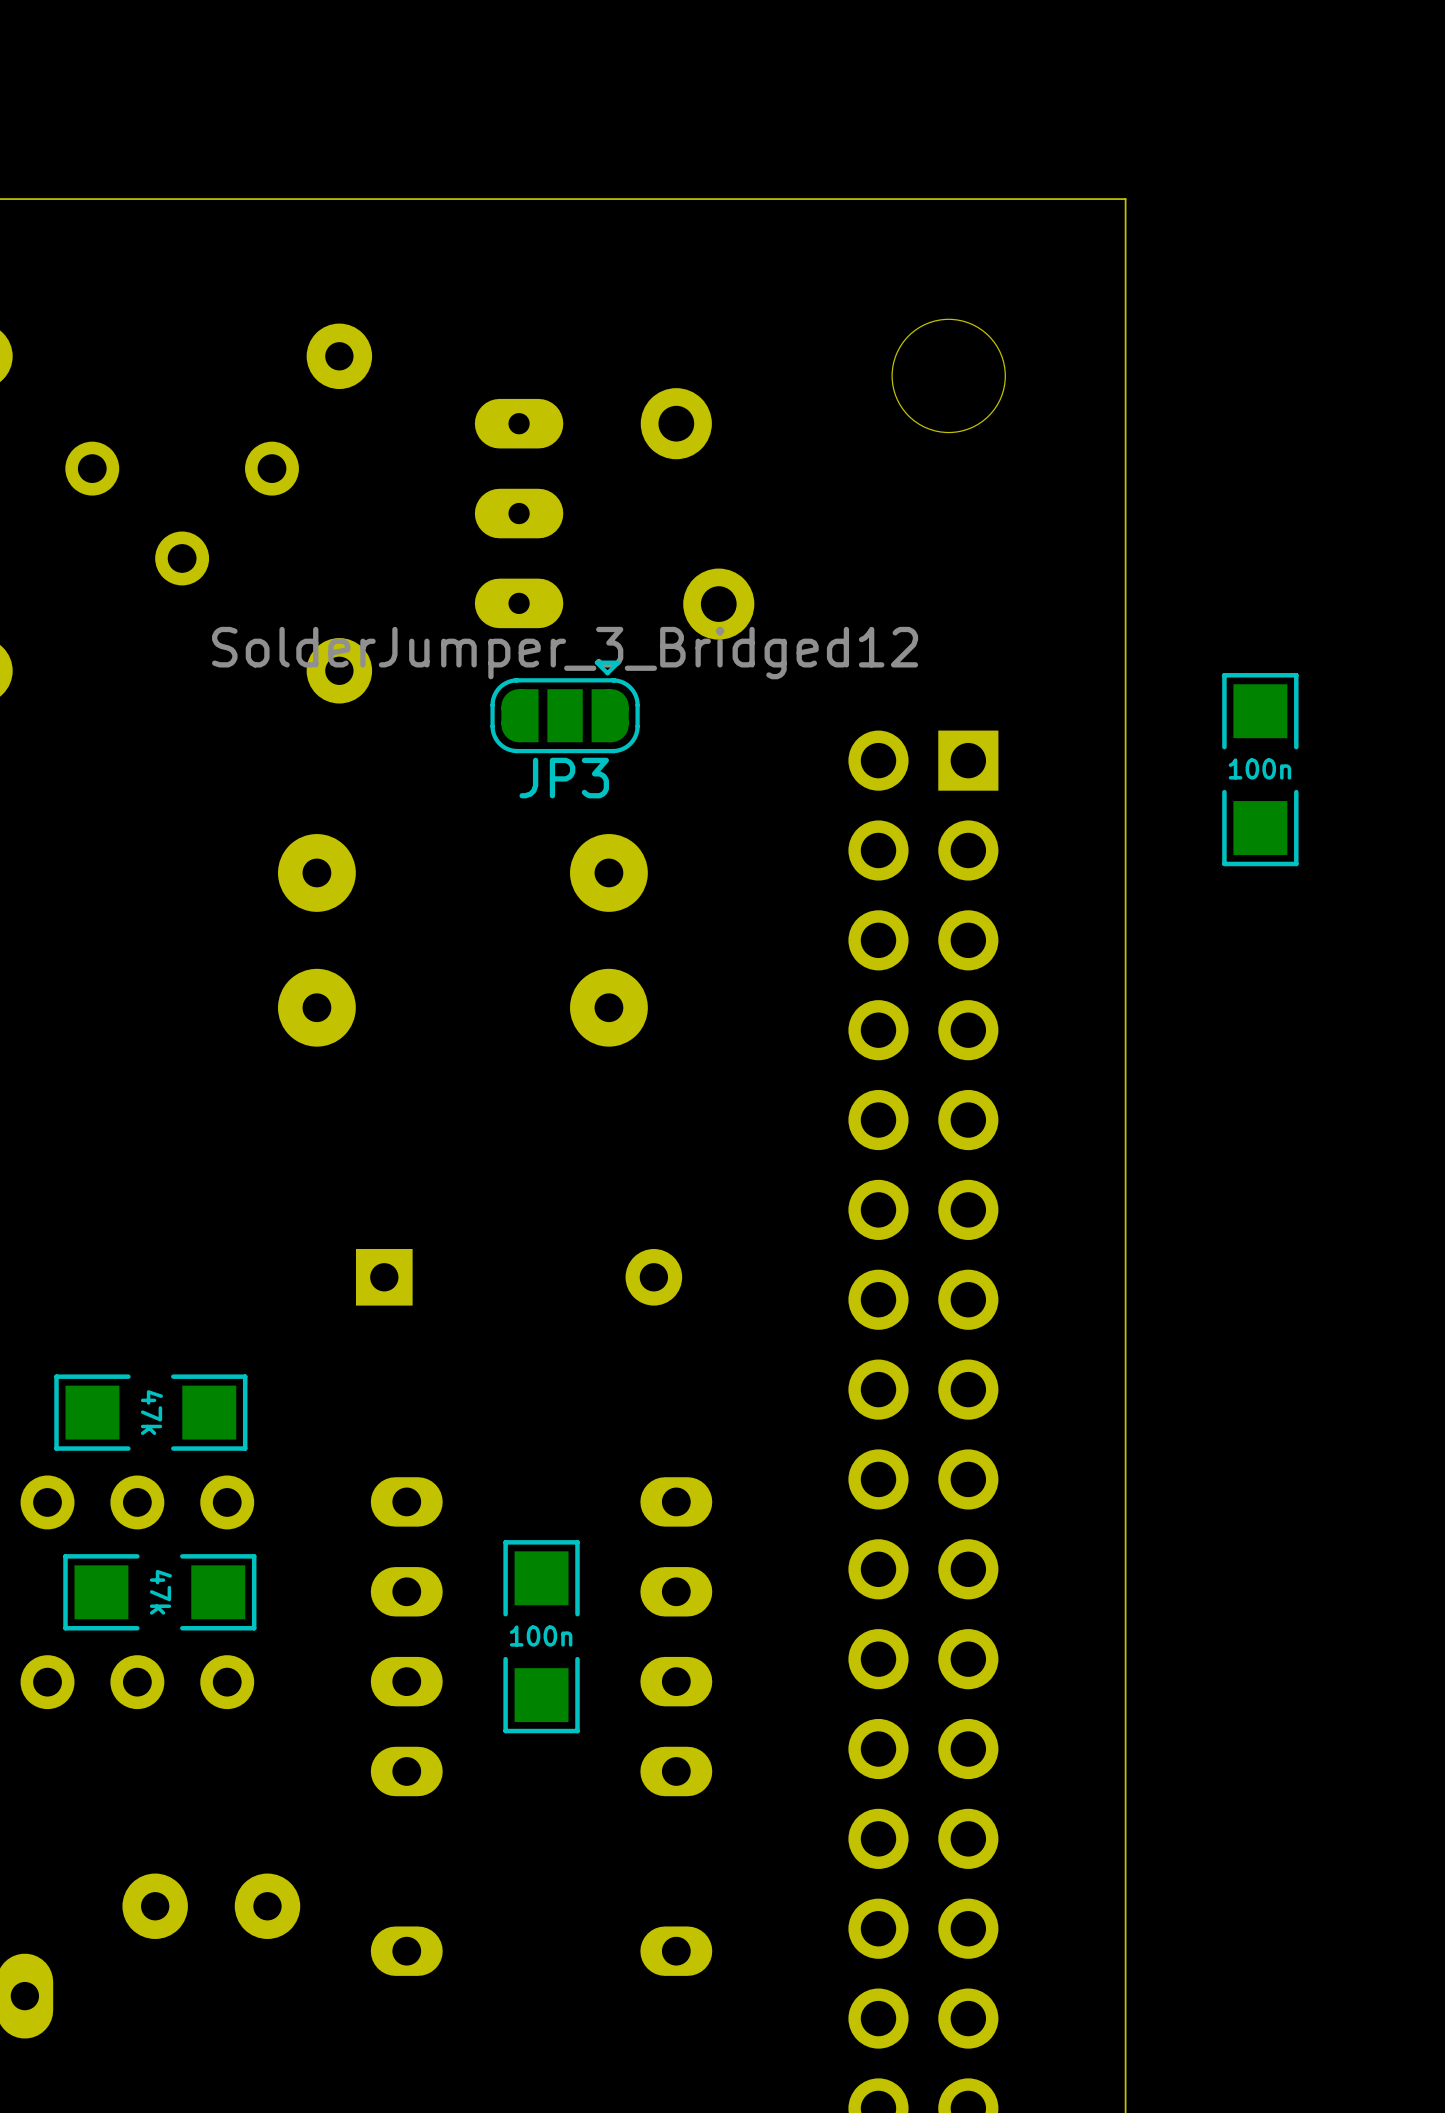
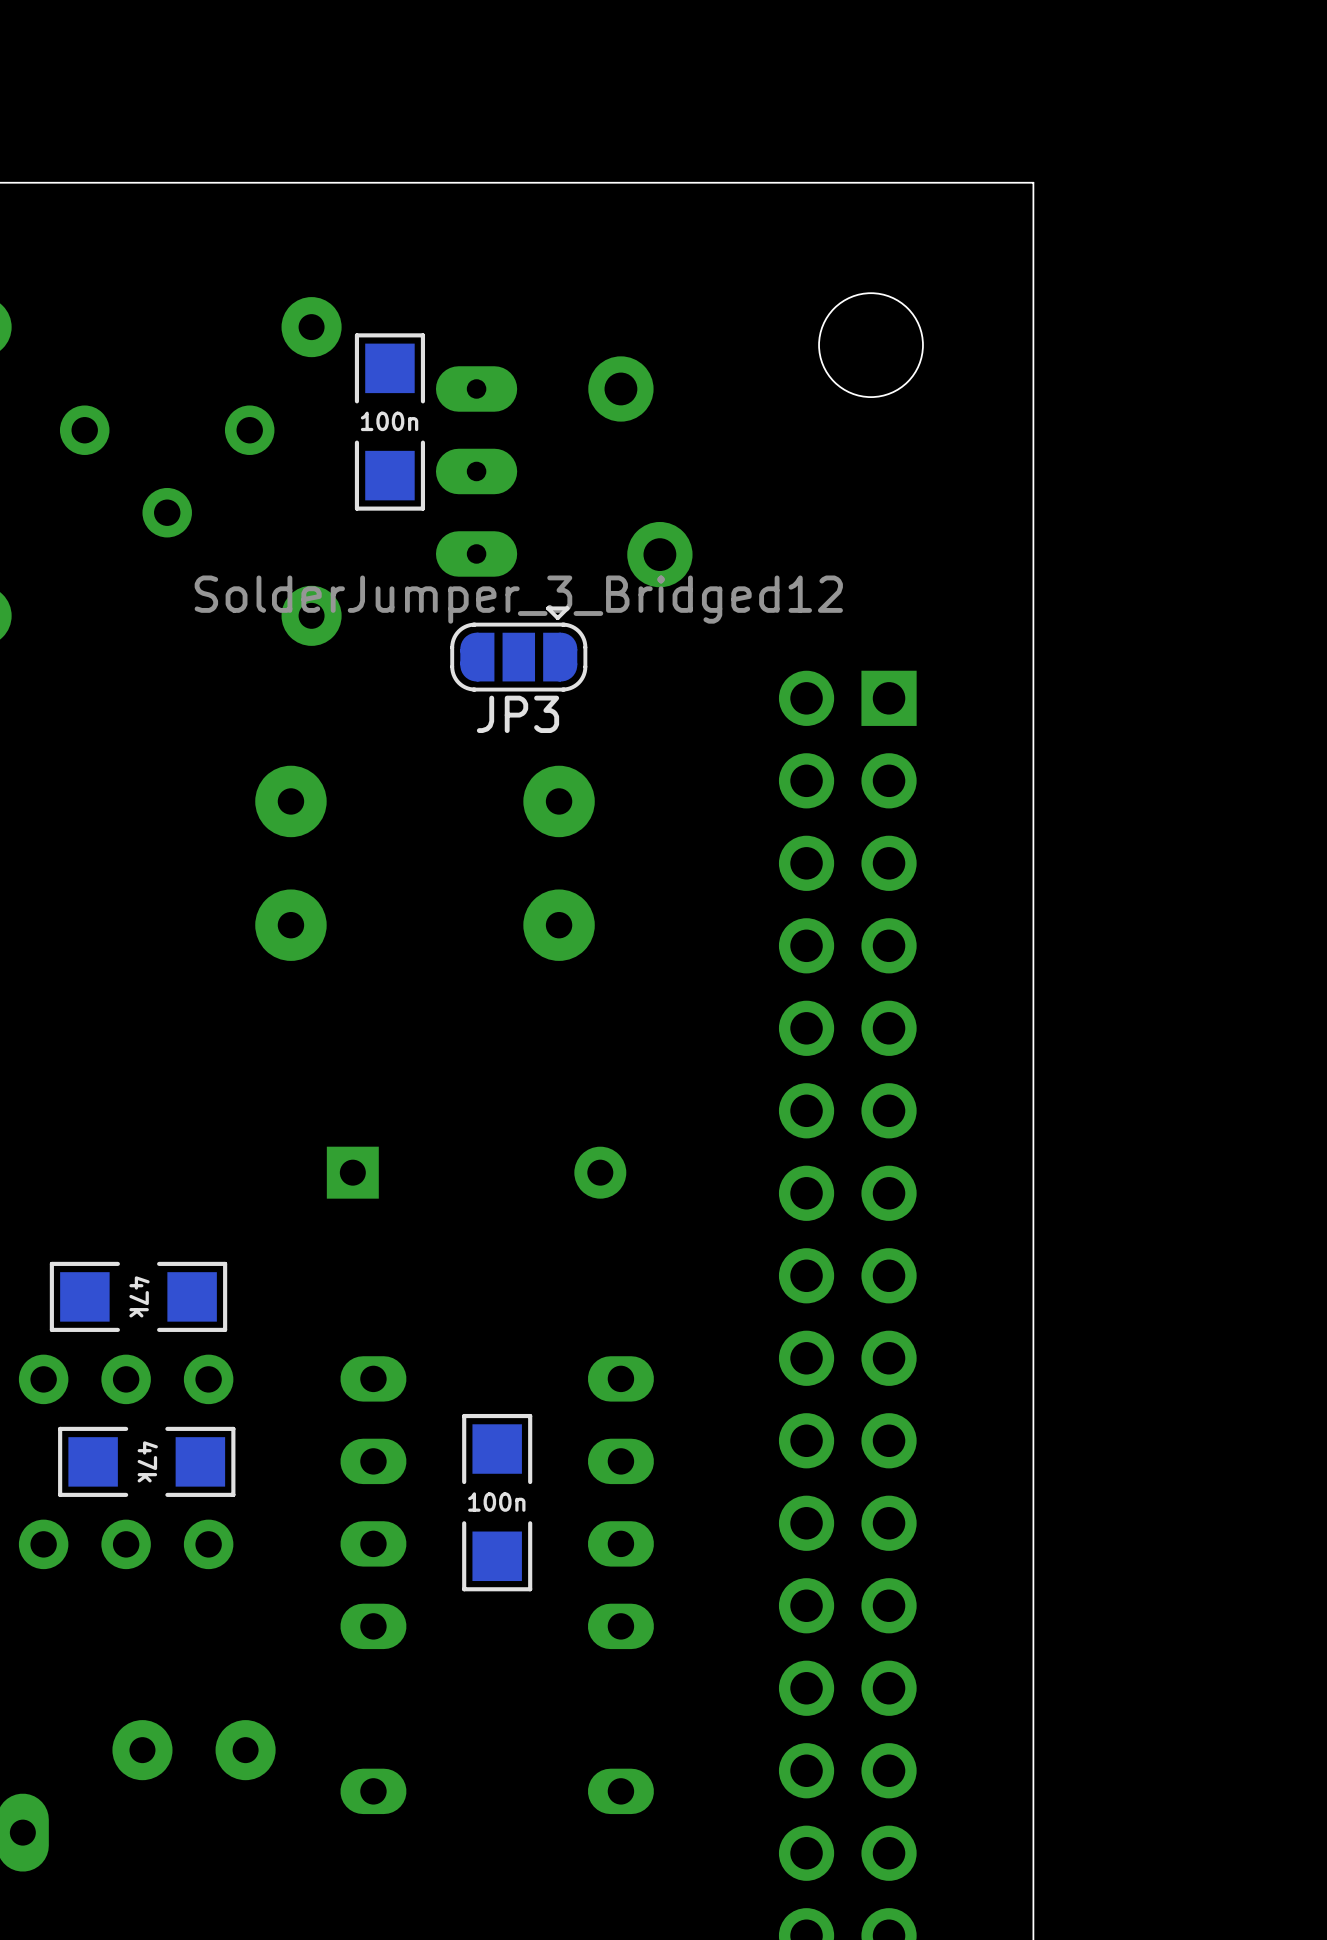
part: none -> 100n (389, 421)
part: 100n (1260, 769) -> none

